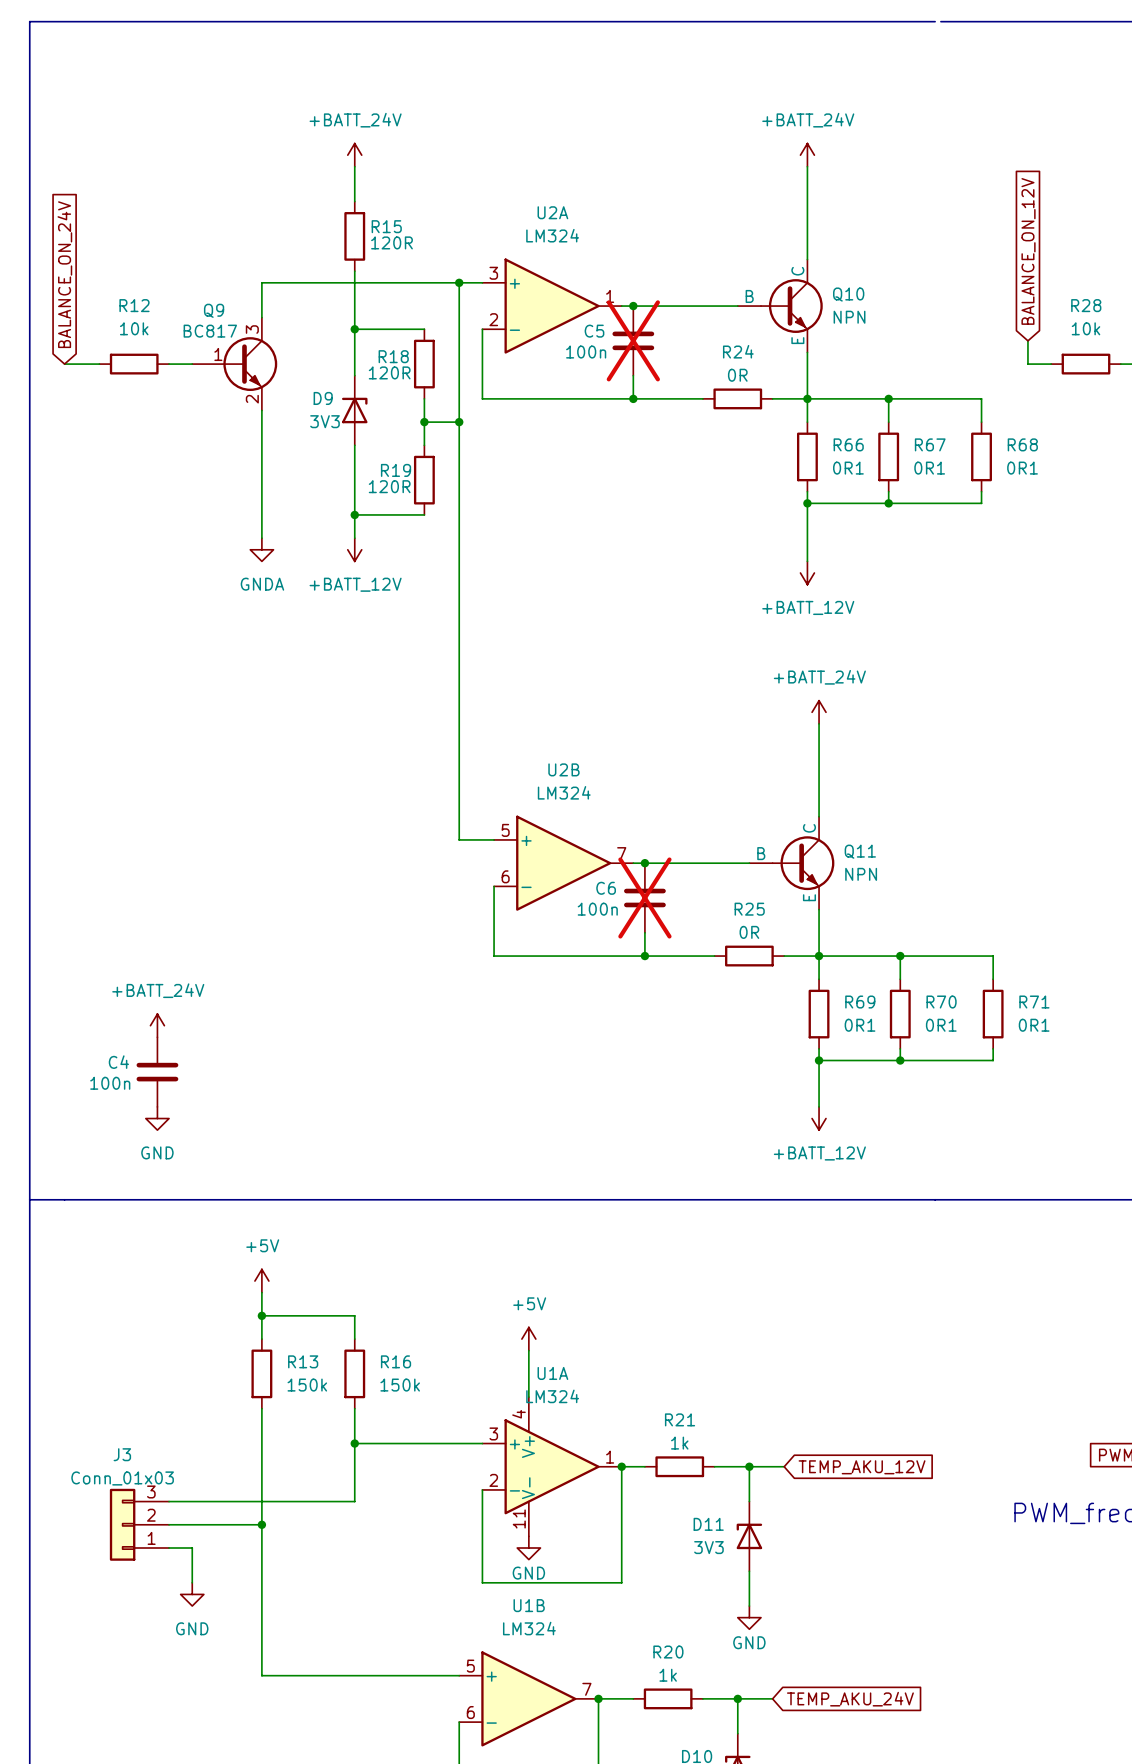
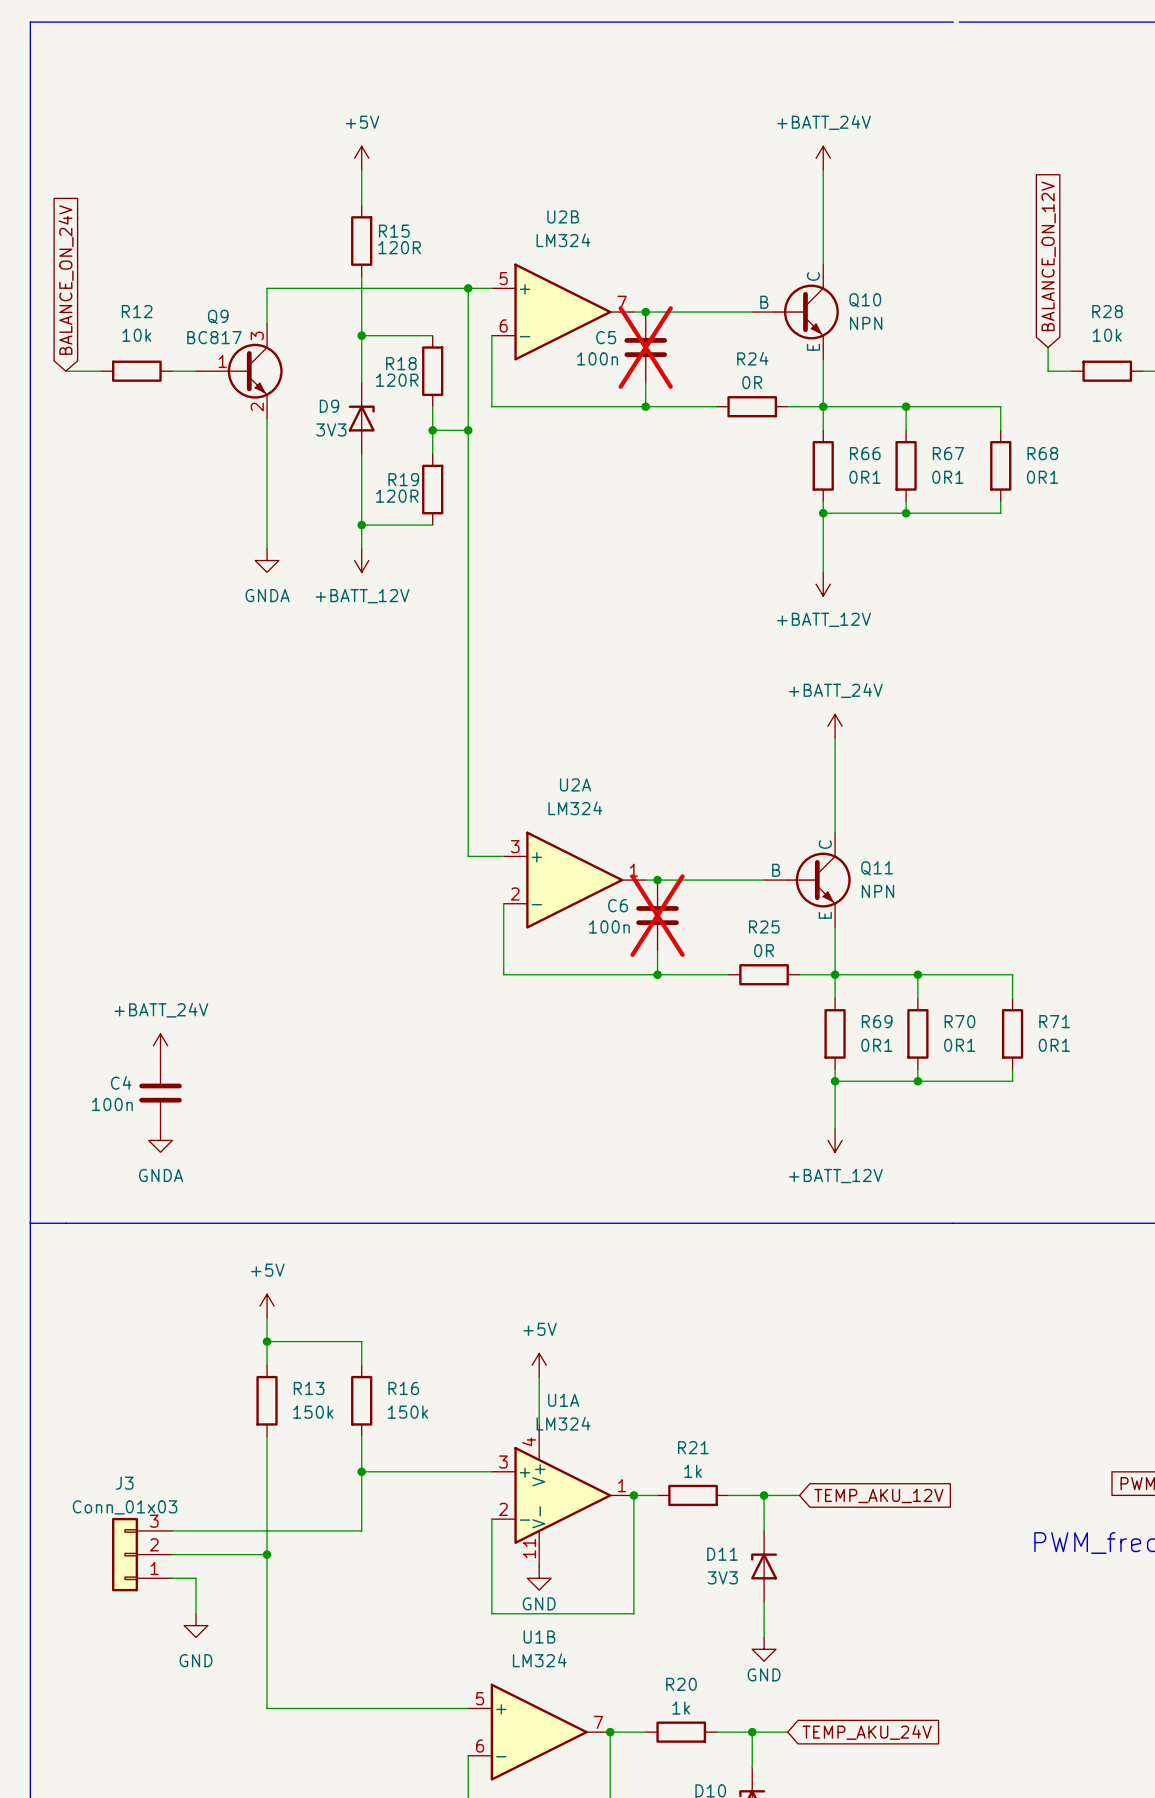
power symbol: +BATT_24V (354, 155) -> +5V (361, 158)
U2A position: (552, 306) -> (574, 880)
U2B position: (563, 863) -> (562, 312)
power symbol: GND (157, 1118) -> GNDA (160, 1140)

